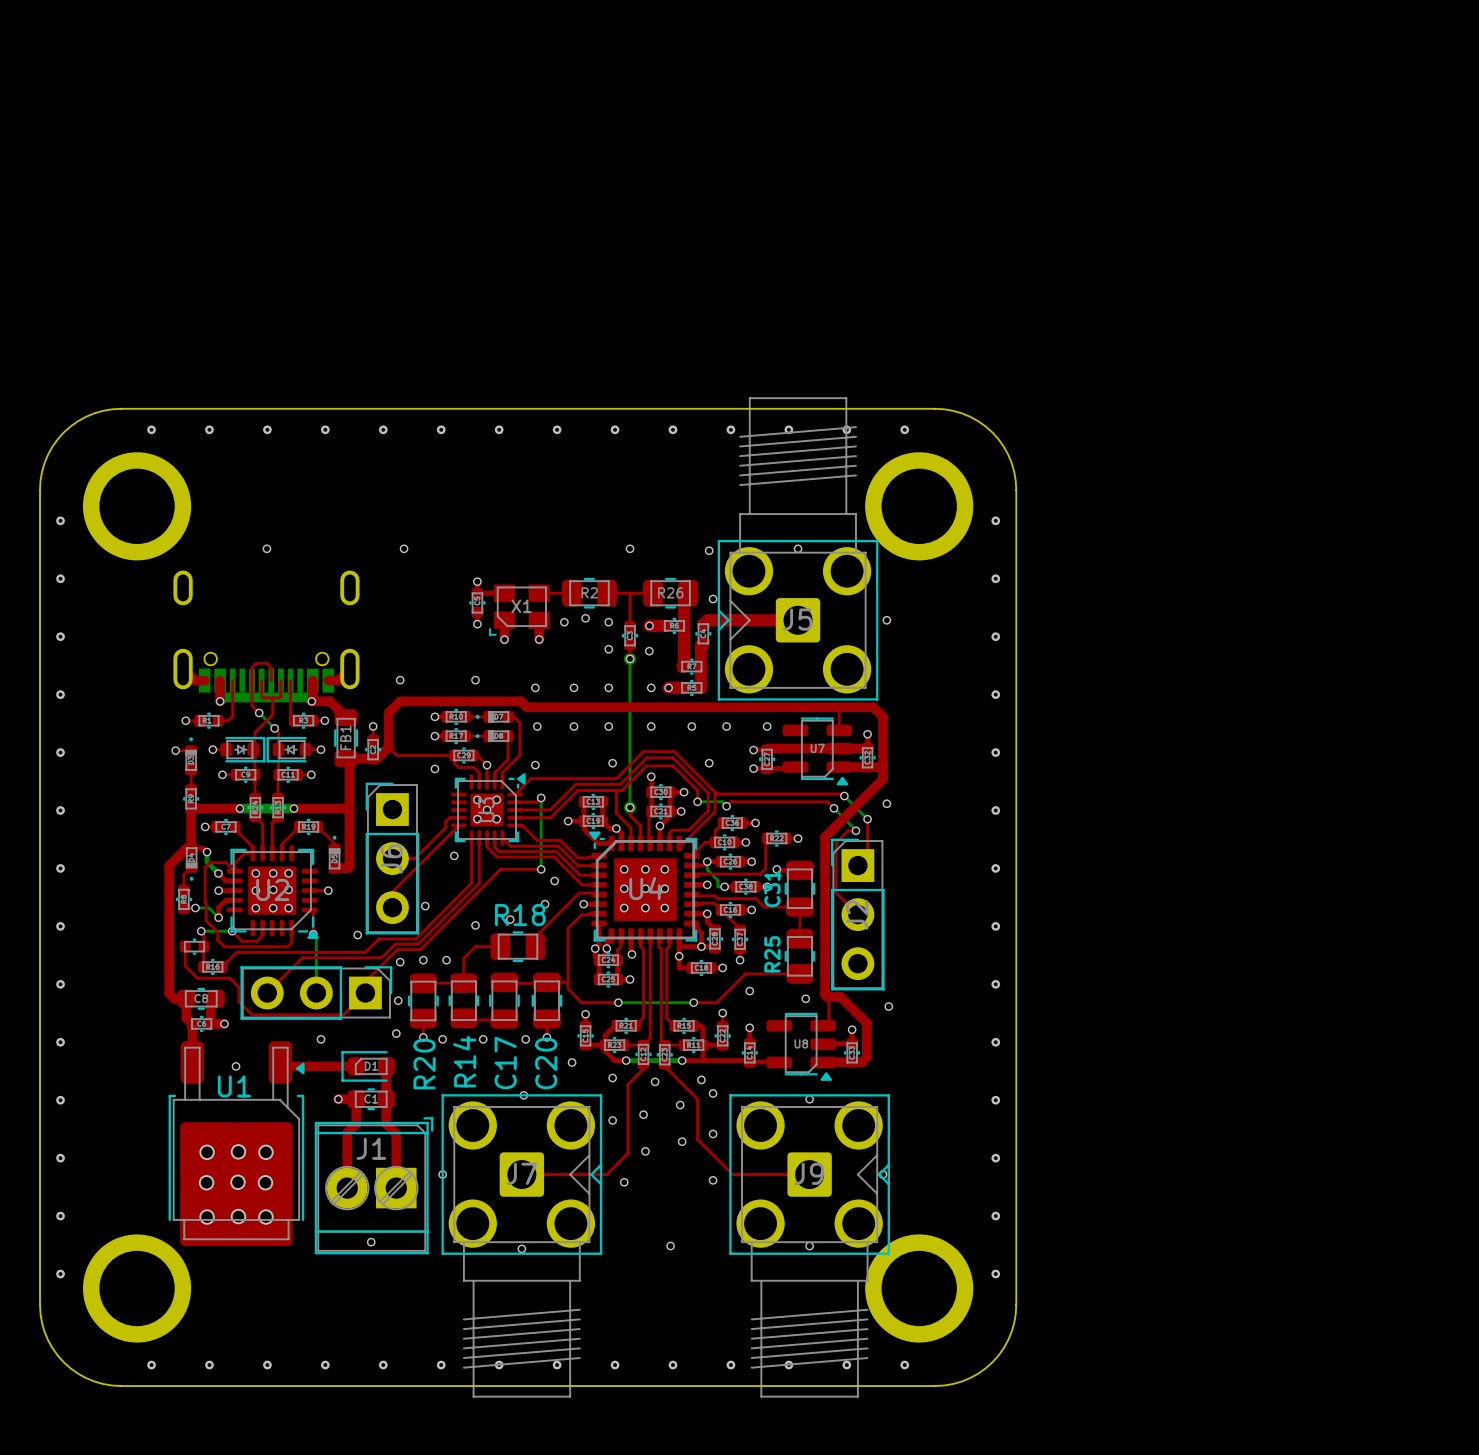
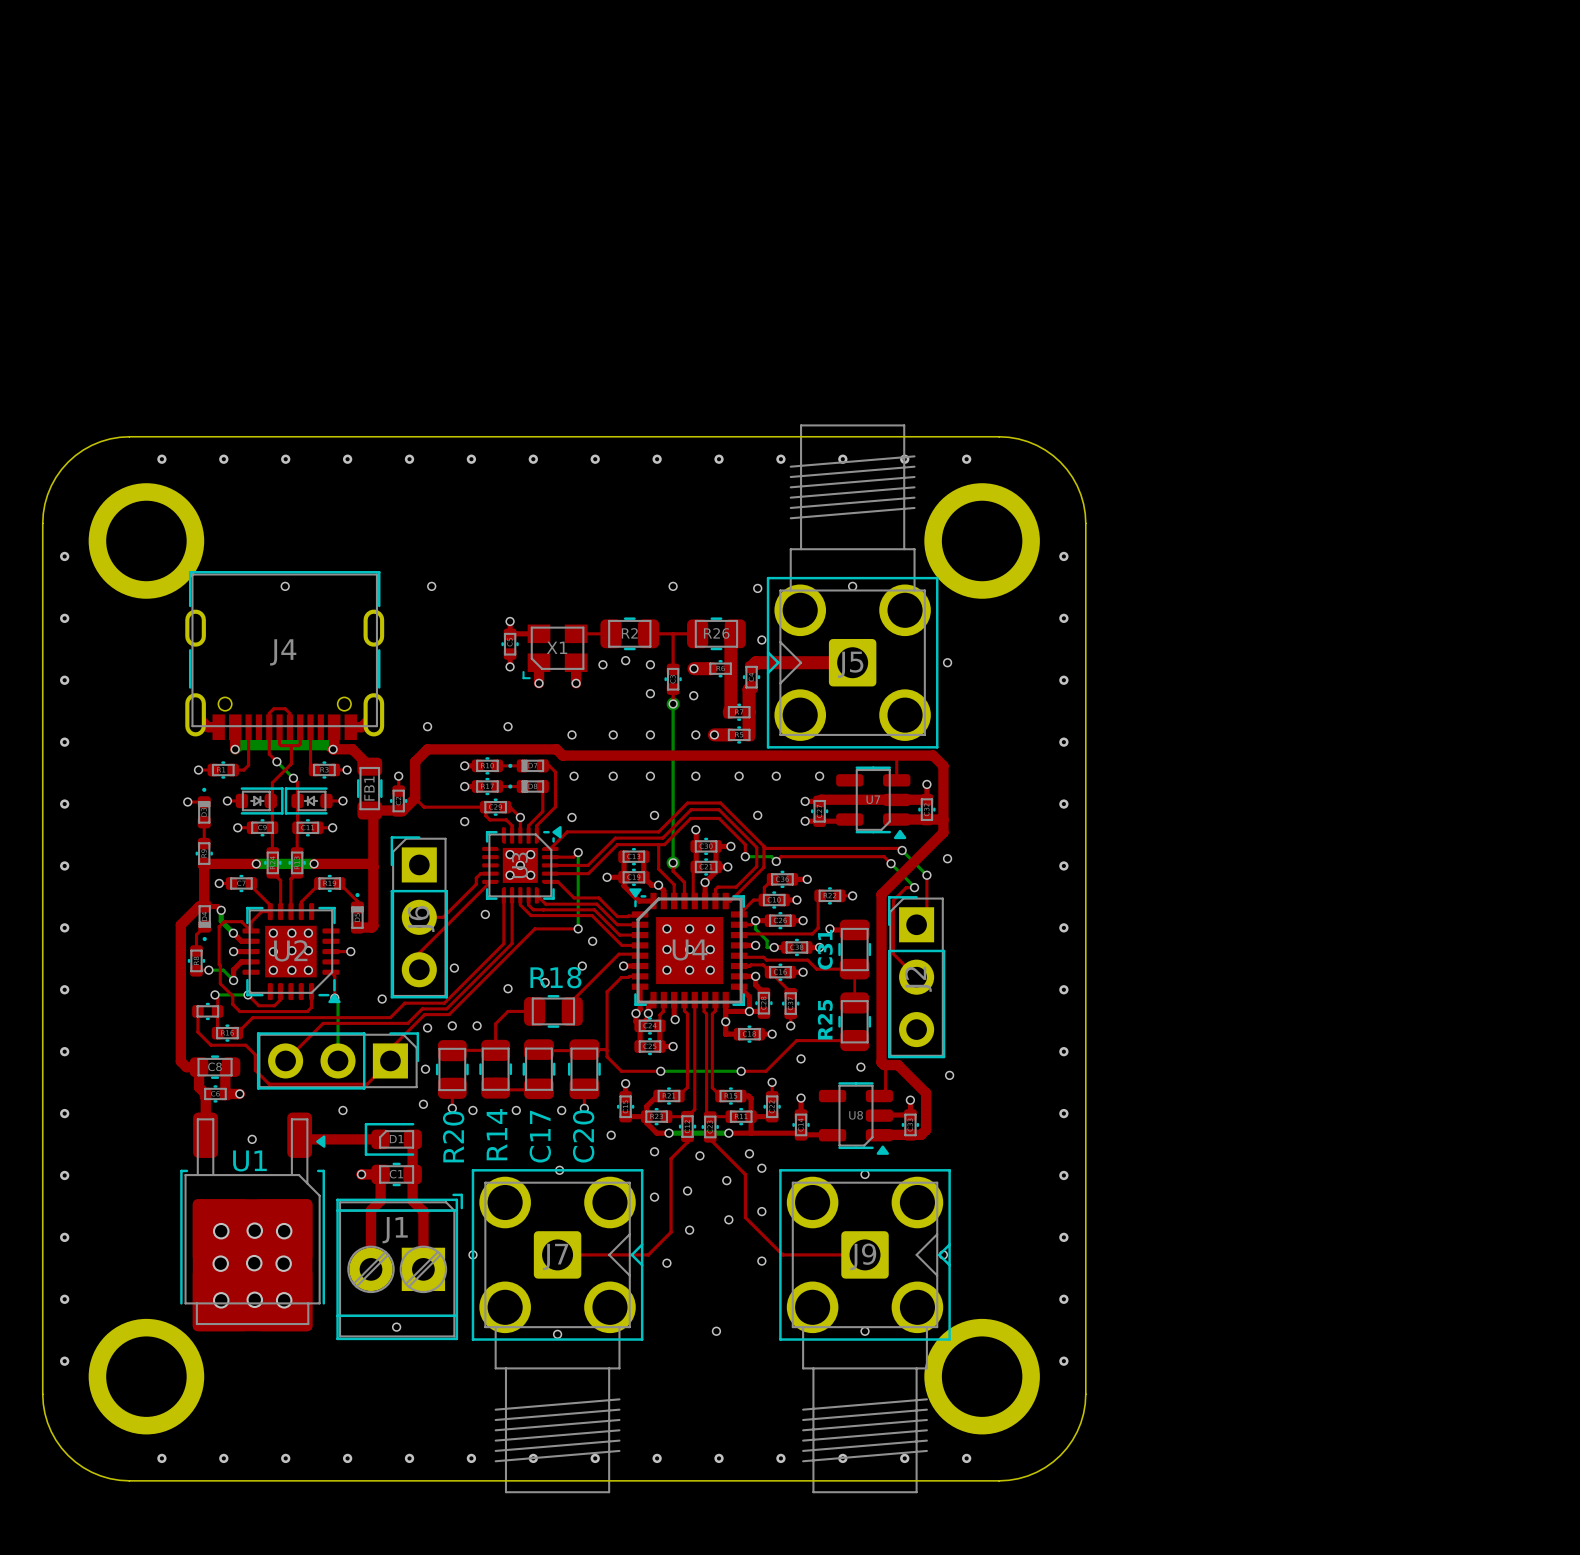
J4 side: bottom (266, 631) -> top (284, 655)

